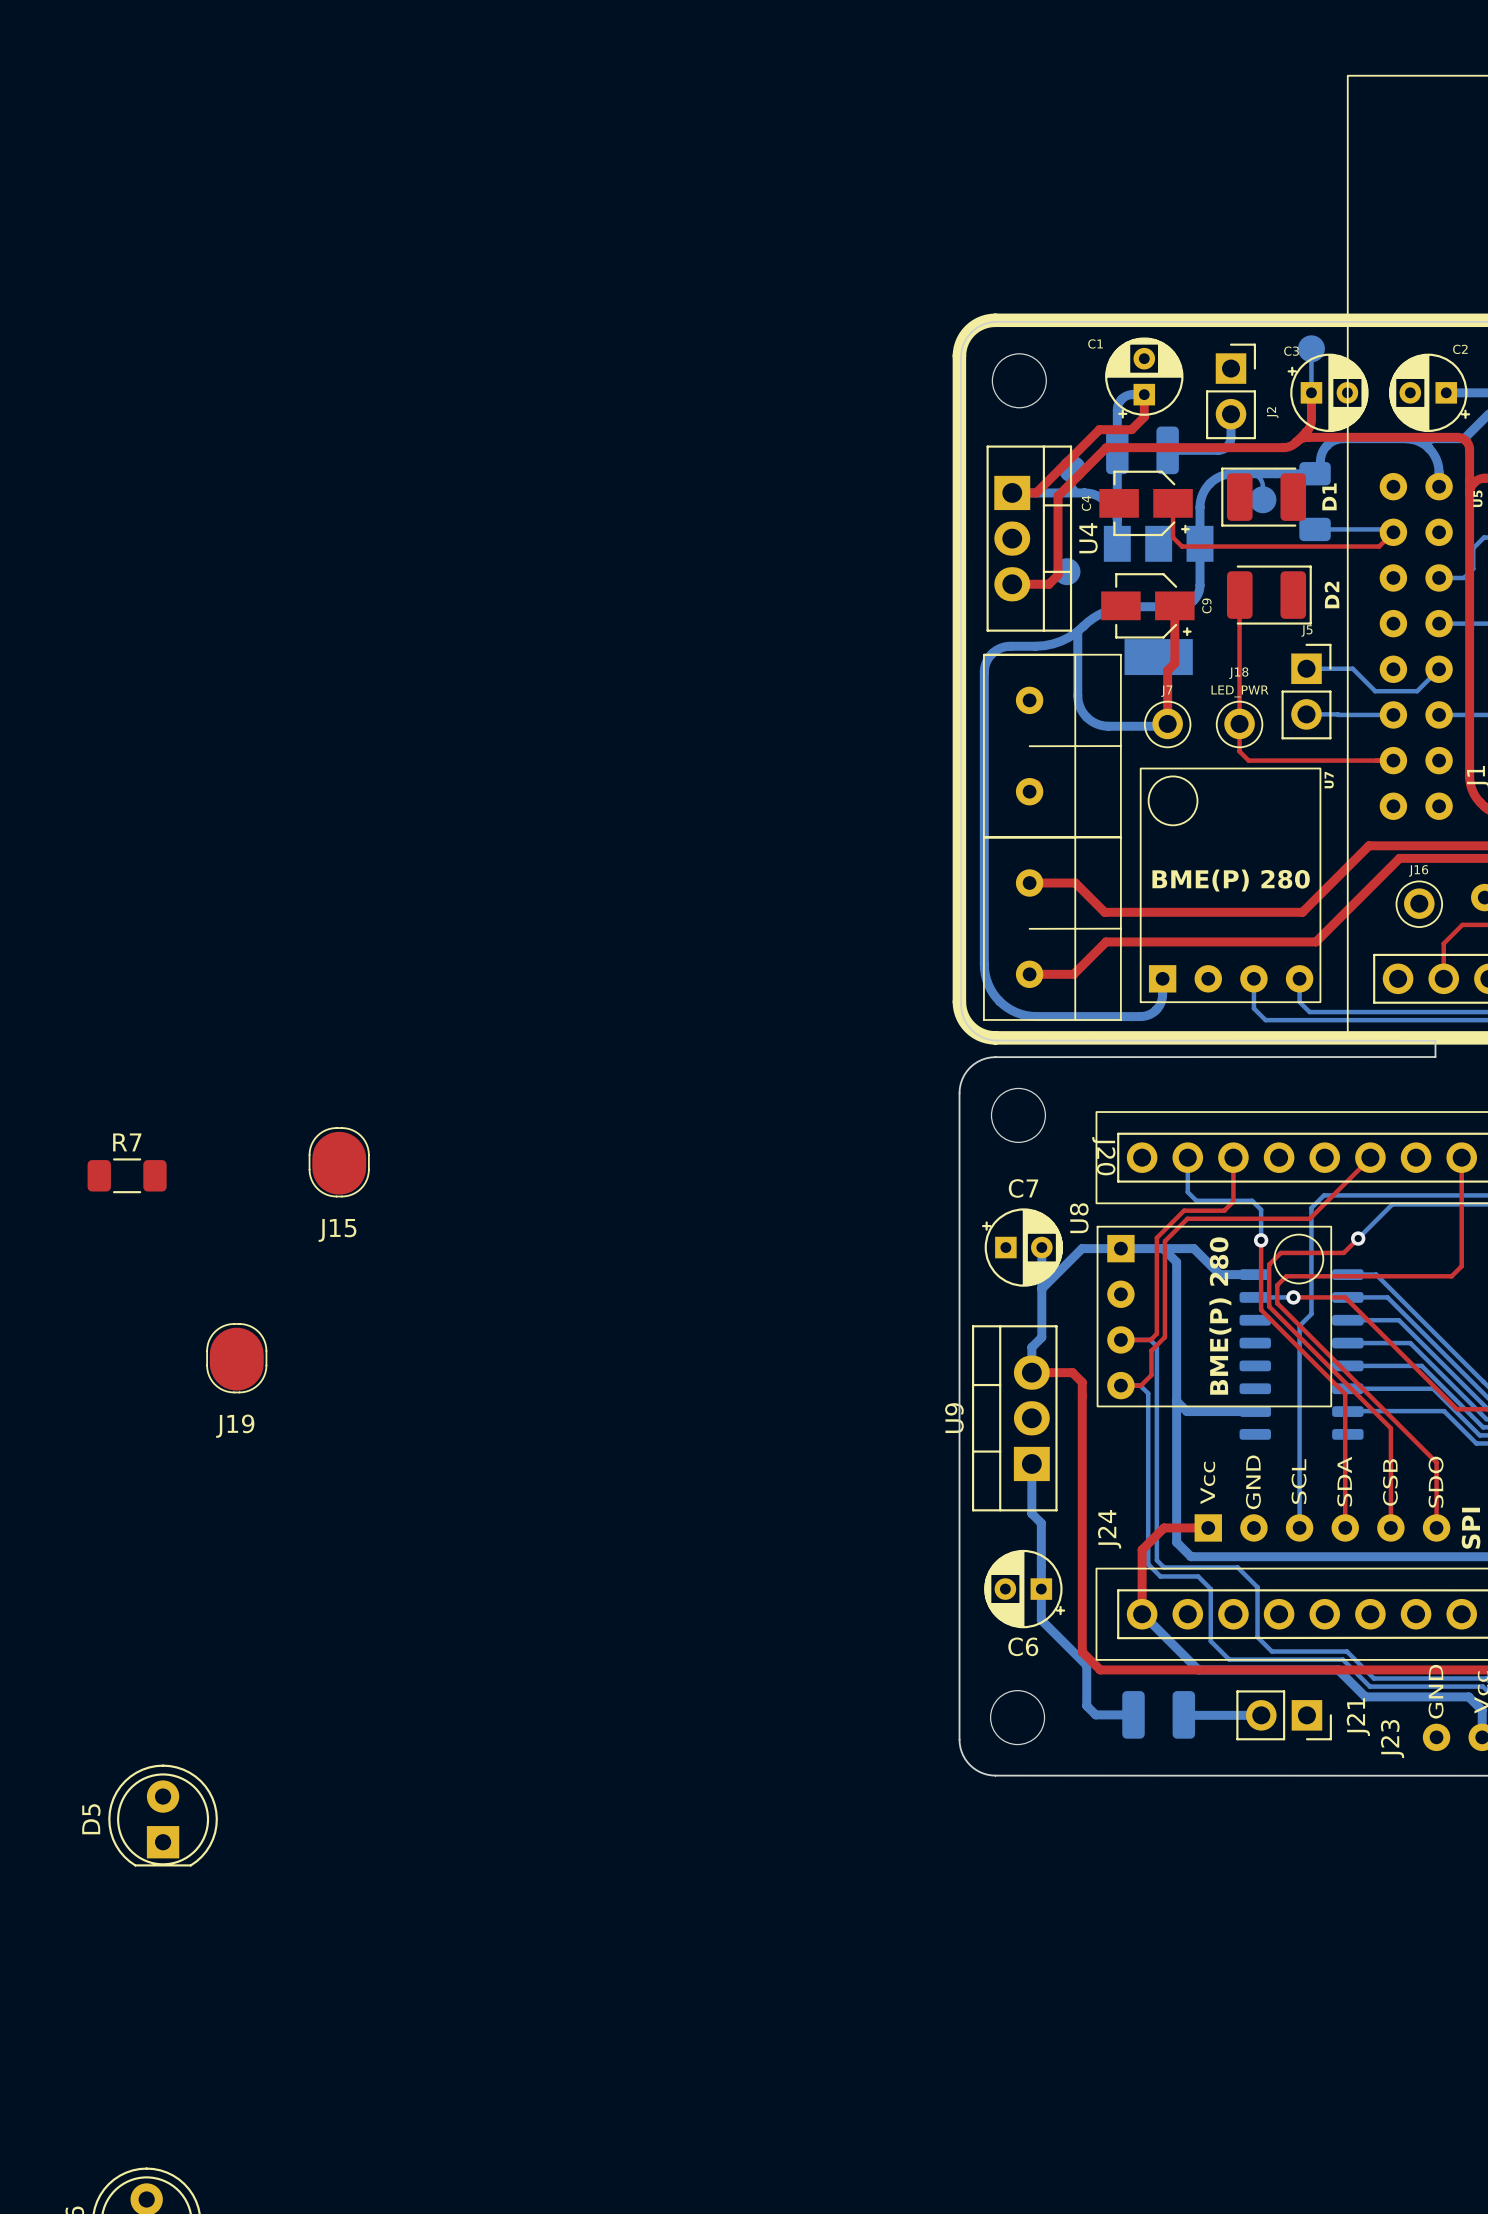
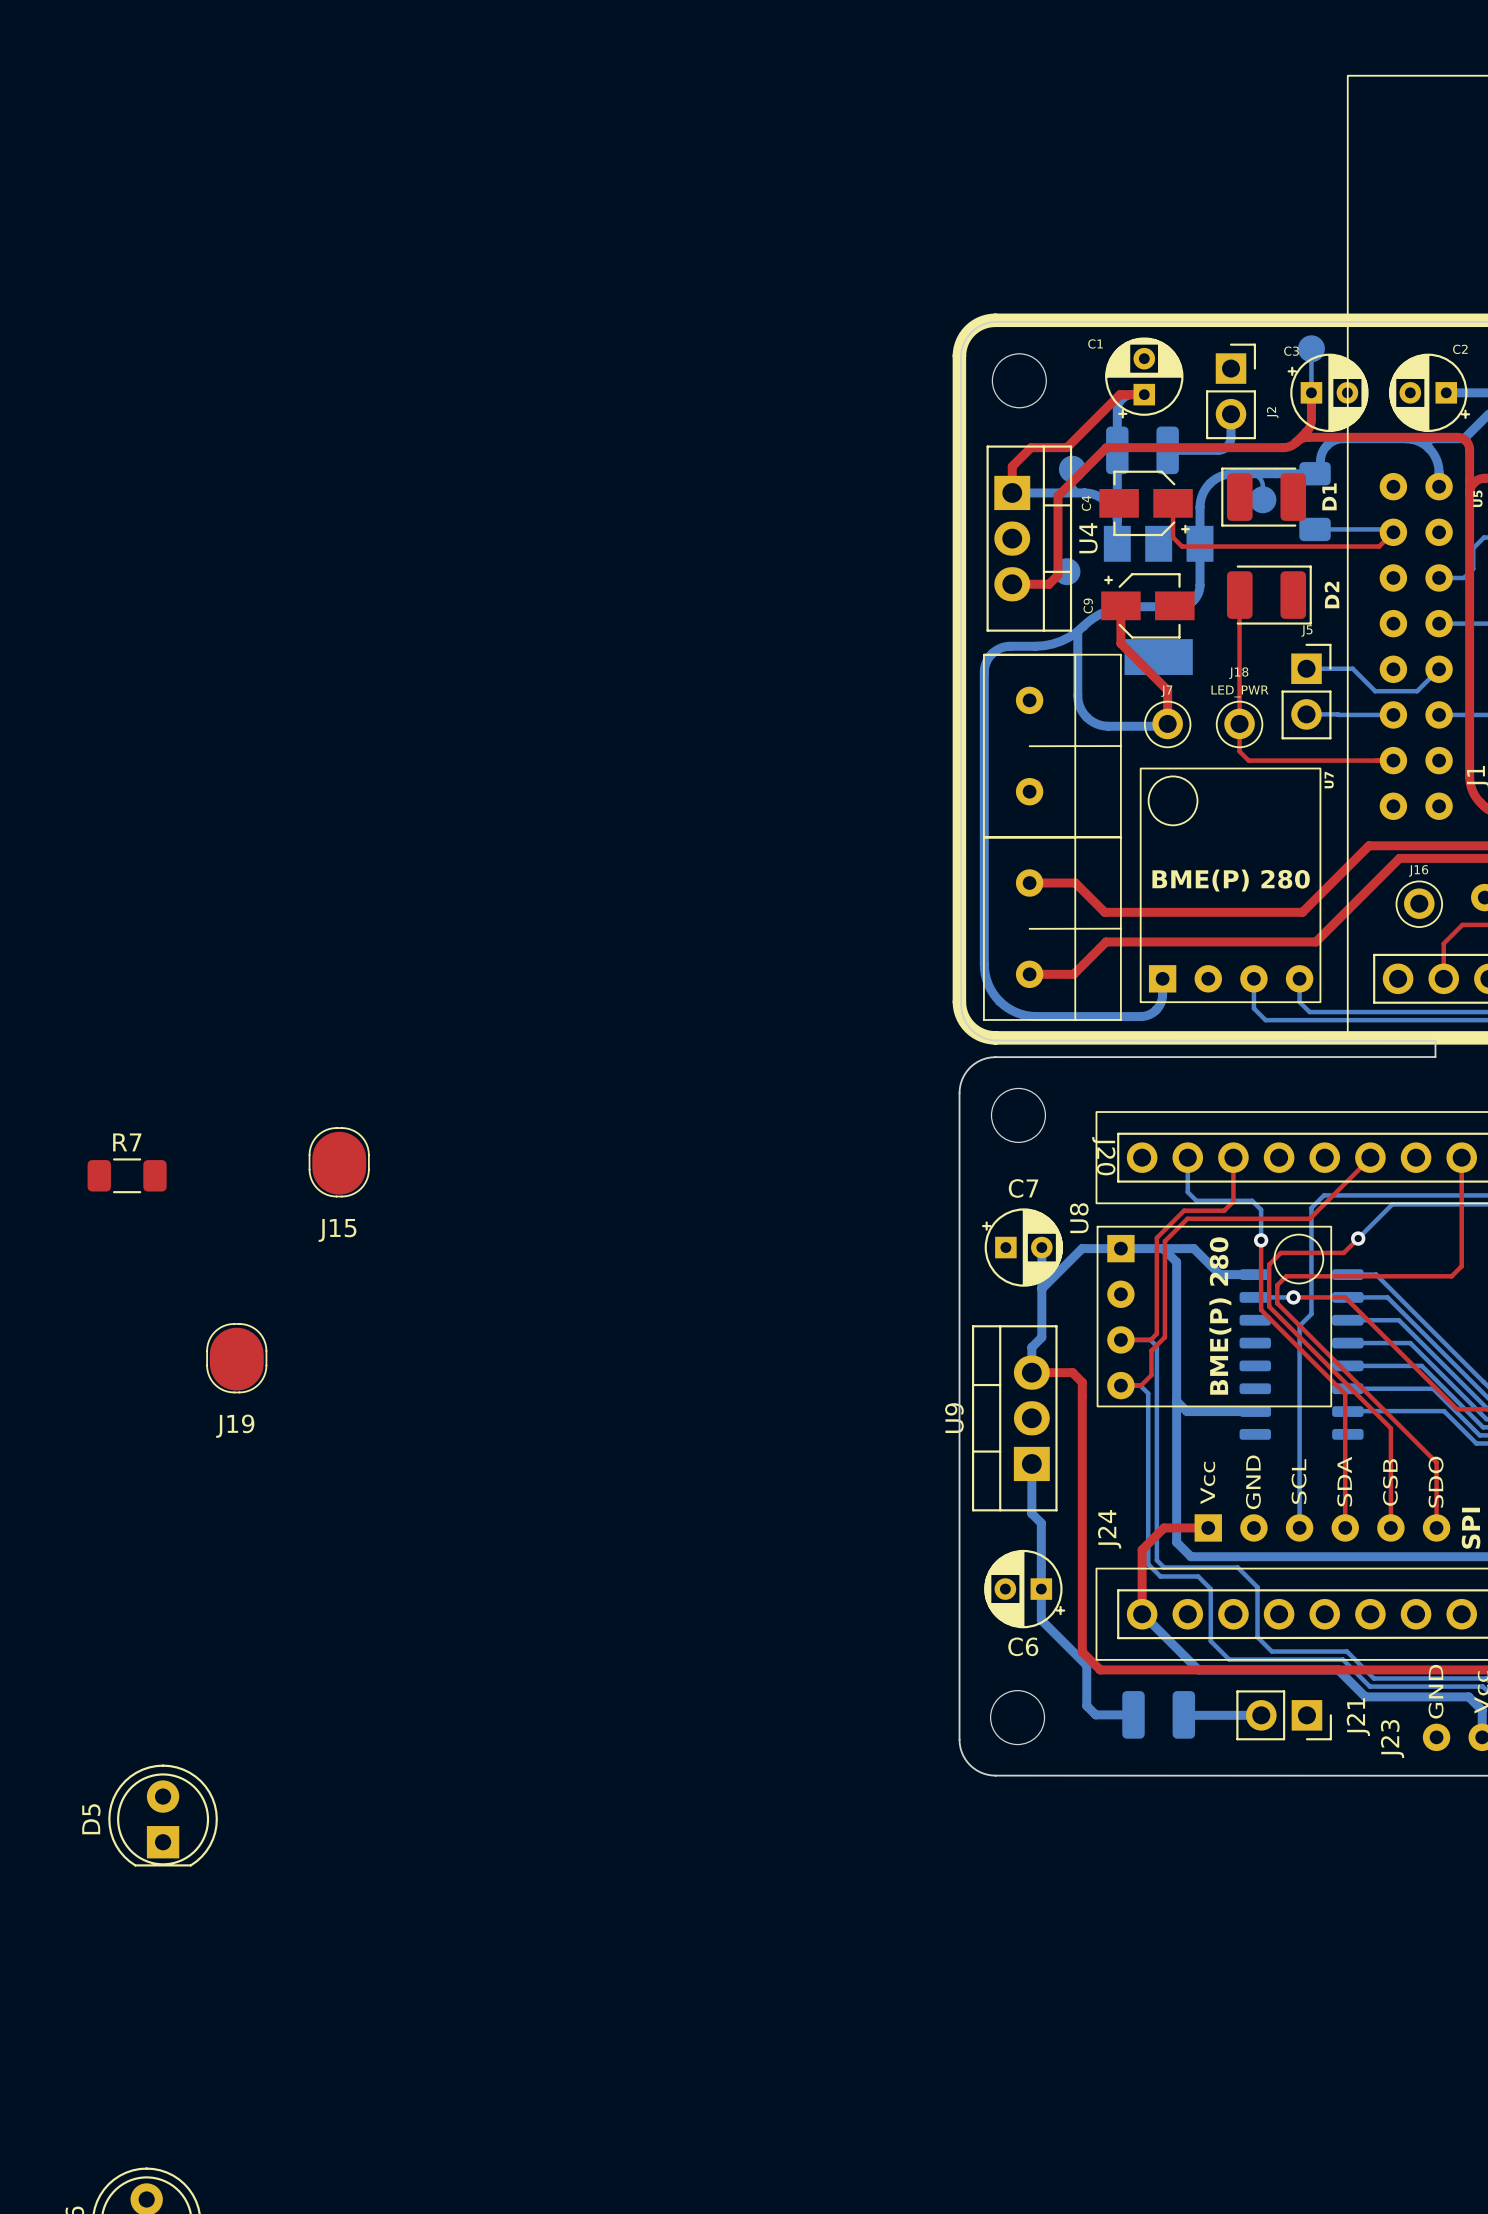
top track: (1144, 394) (1144, 417) (1131, 429) (1099, 429) (1036, 492) (1012, 492) -> (1144, 394) (1120, 394) (1066, 447) (1031, 447) (1012, 466) (1012, 492)
C9 rotation: 0° (1147, 605) -> 180° (1147, 605)
top track: (1174, 605) (1174, 663) (1167, 670) (1167, 690) -> (1120, 605) (1120, 643) (1167, 690)

